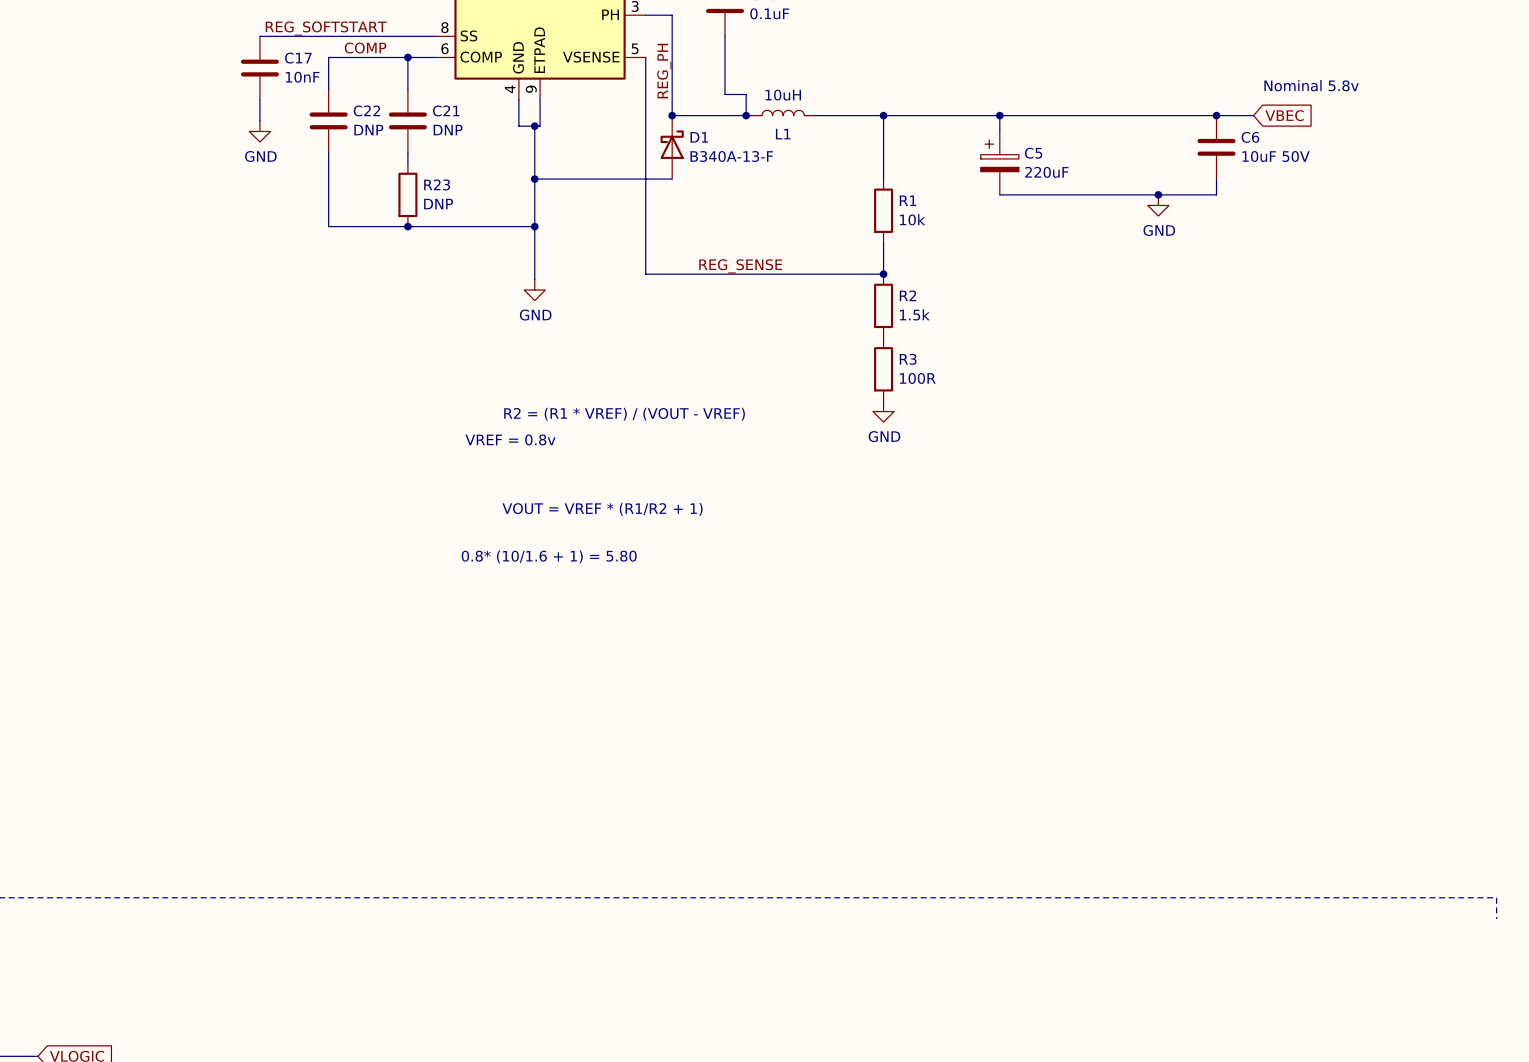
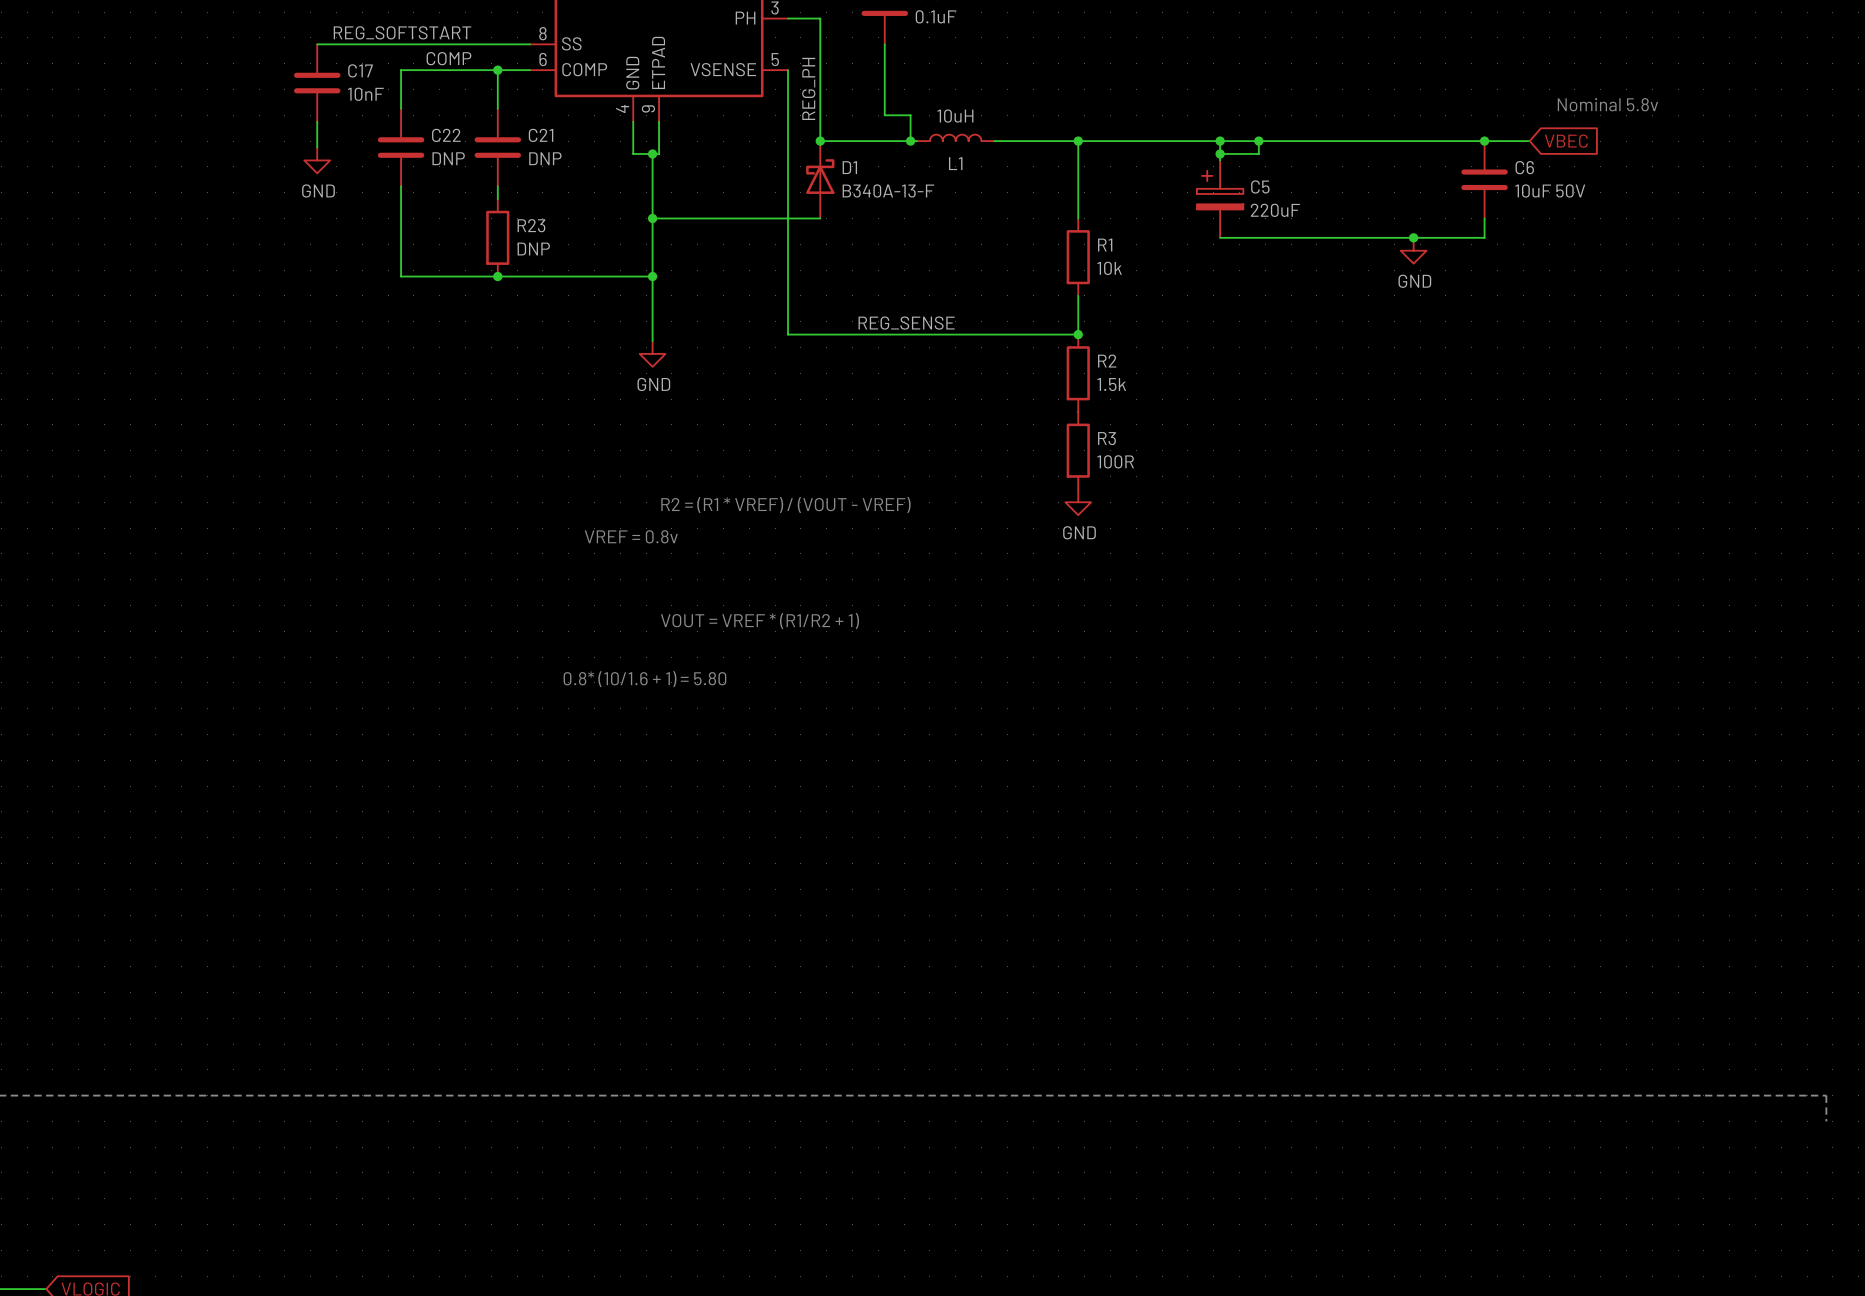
wire: none -> (1258, 141) (1258, 153) (1220, 153)
junction: none -> (1258, 141)
junction: none -> (1220, 153)

